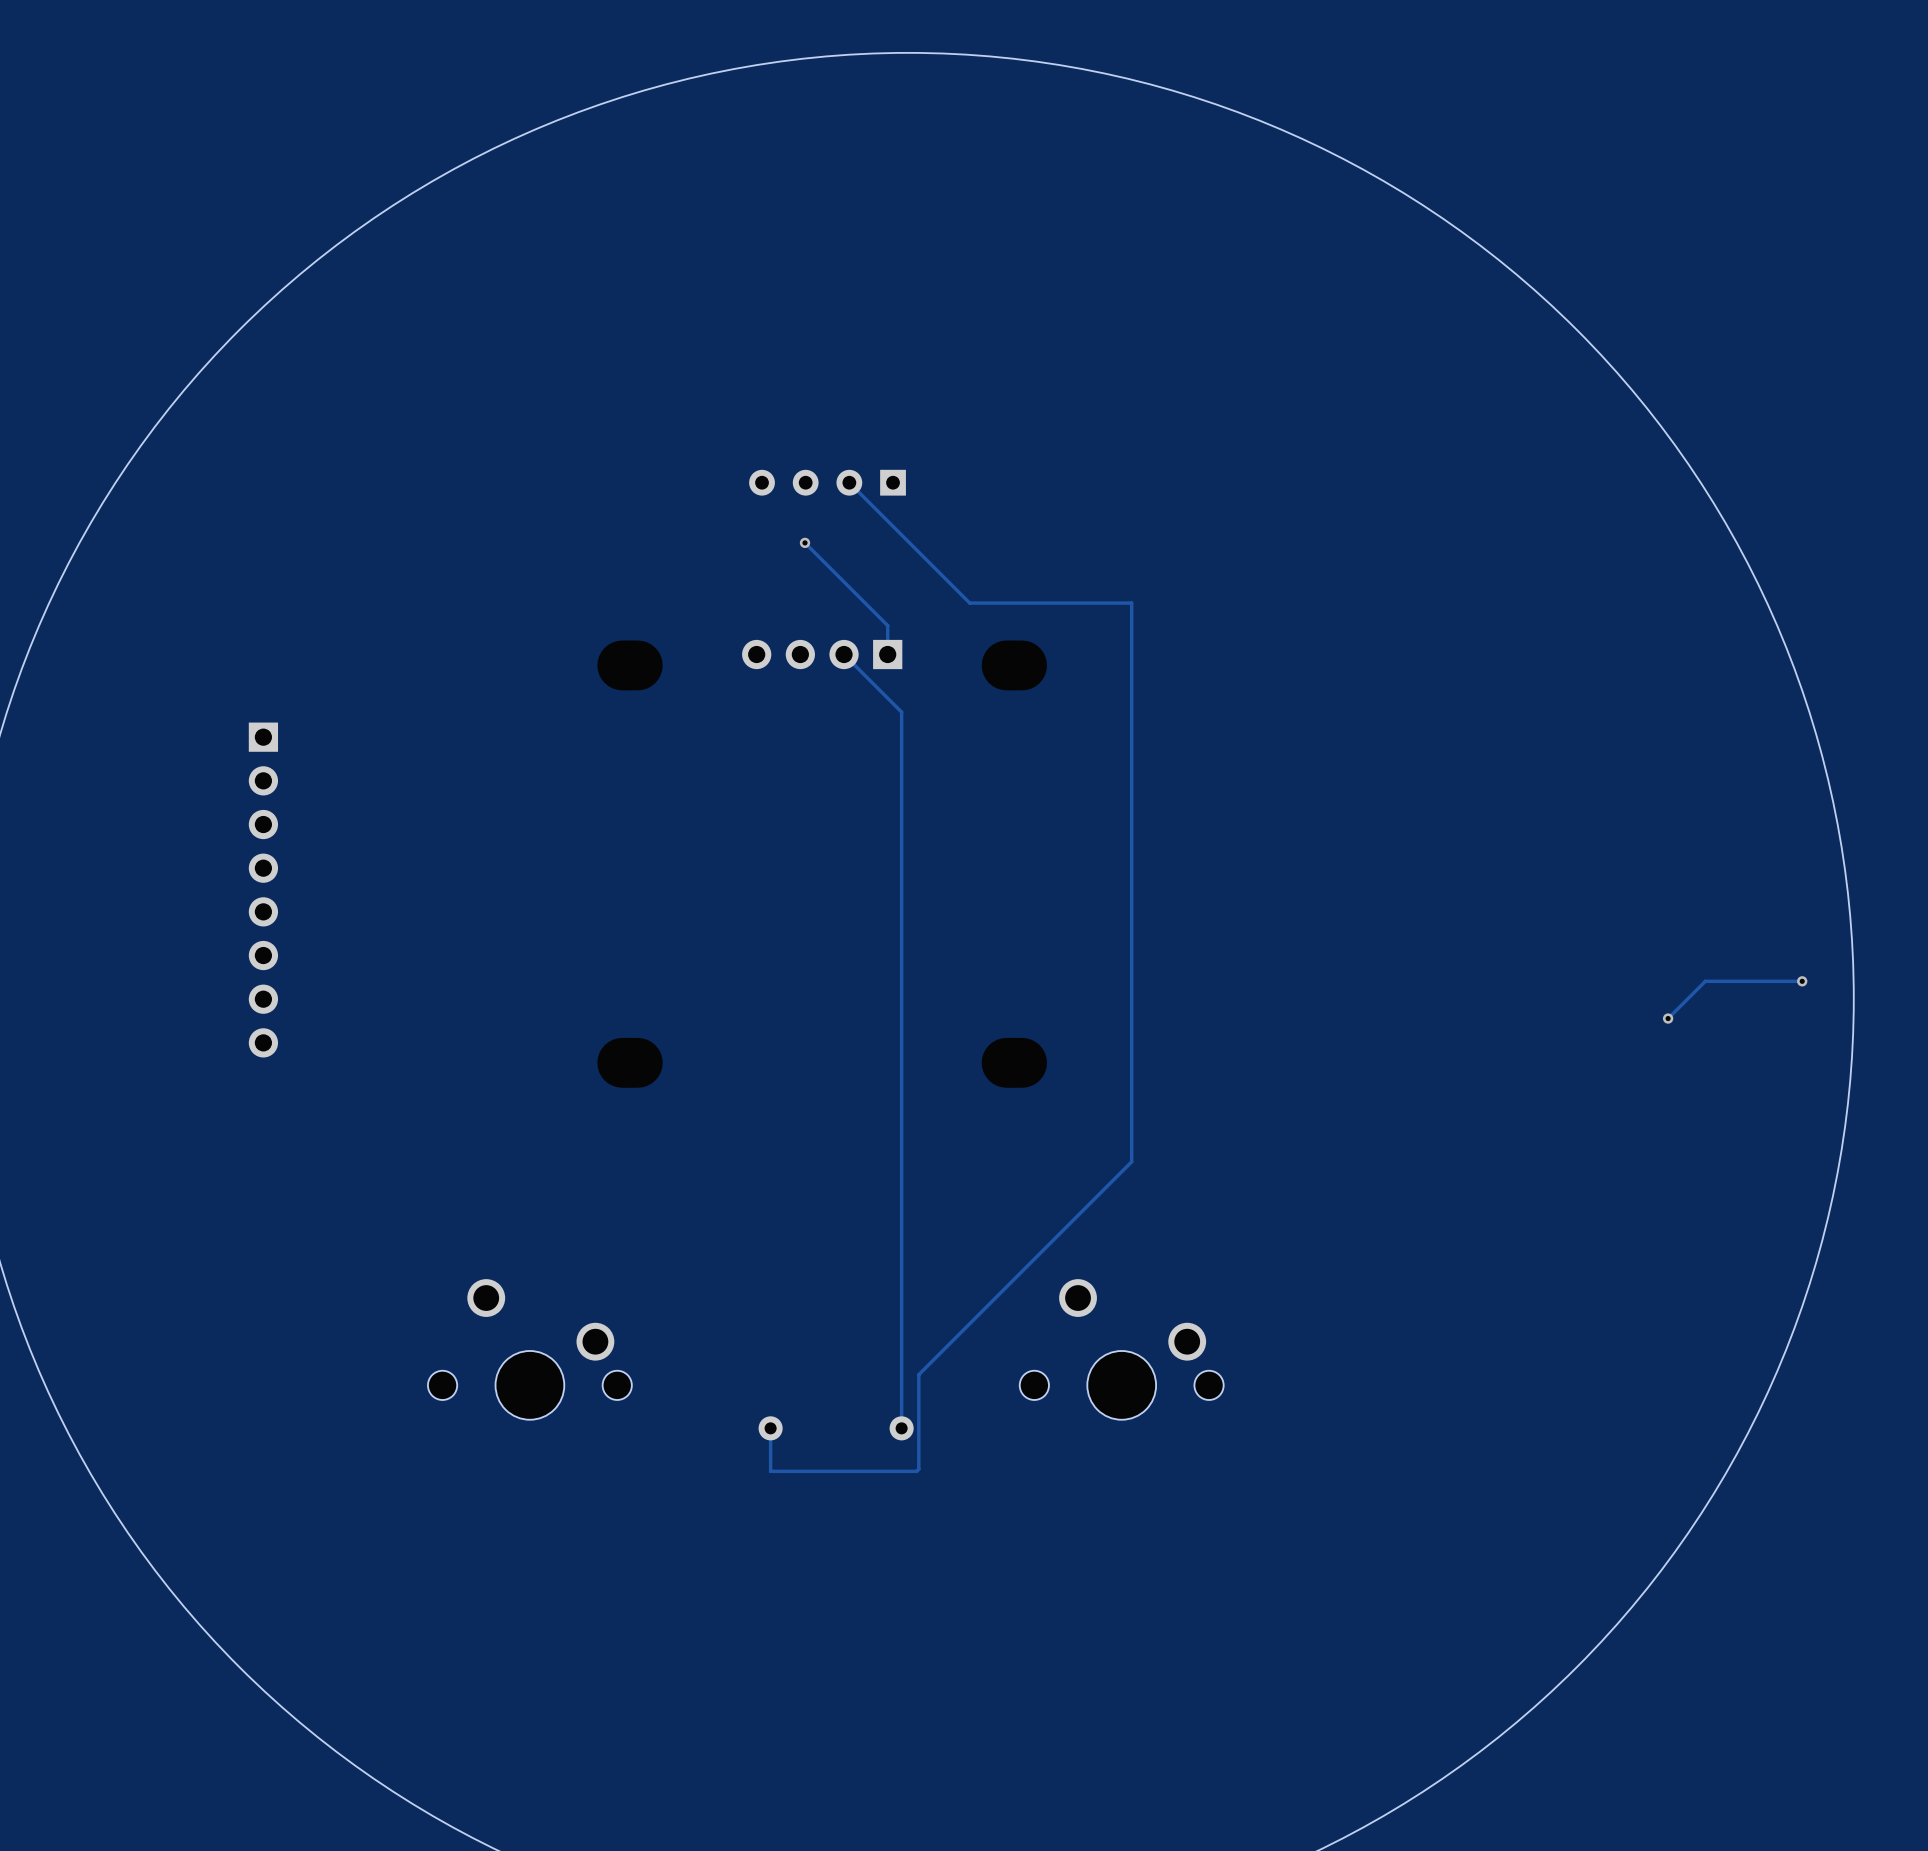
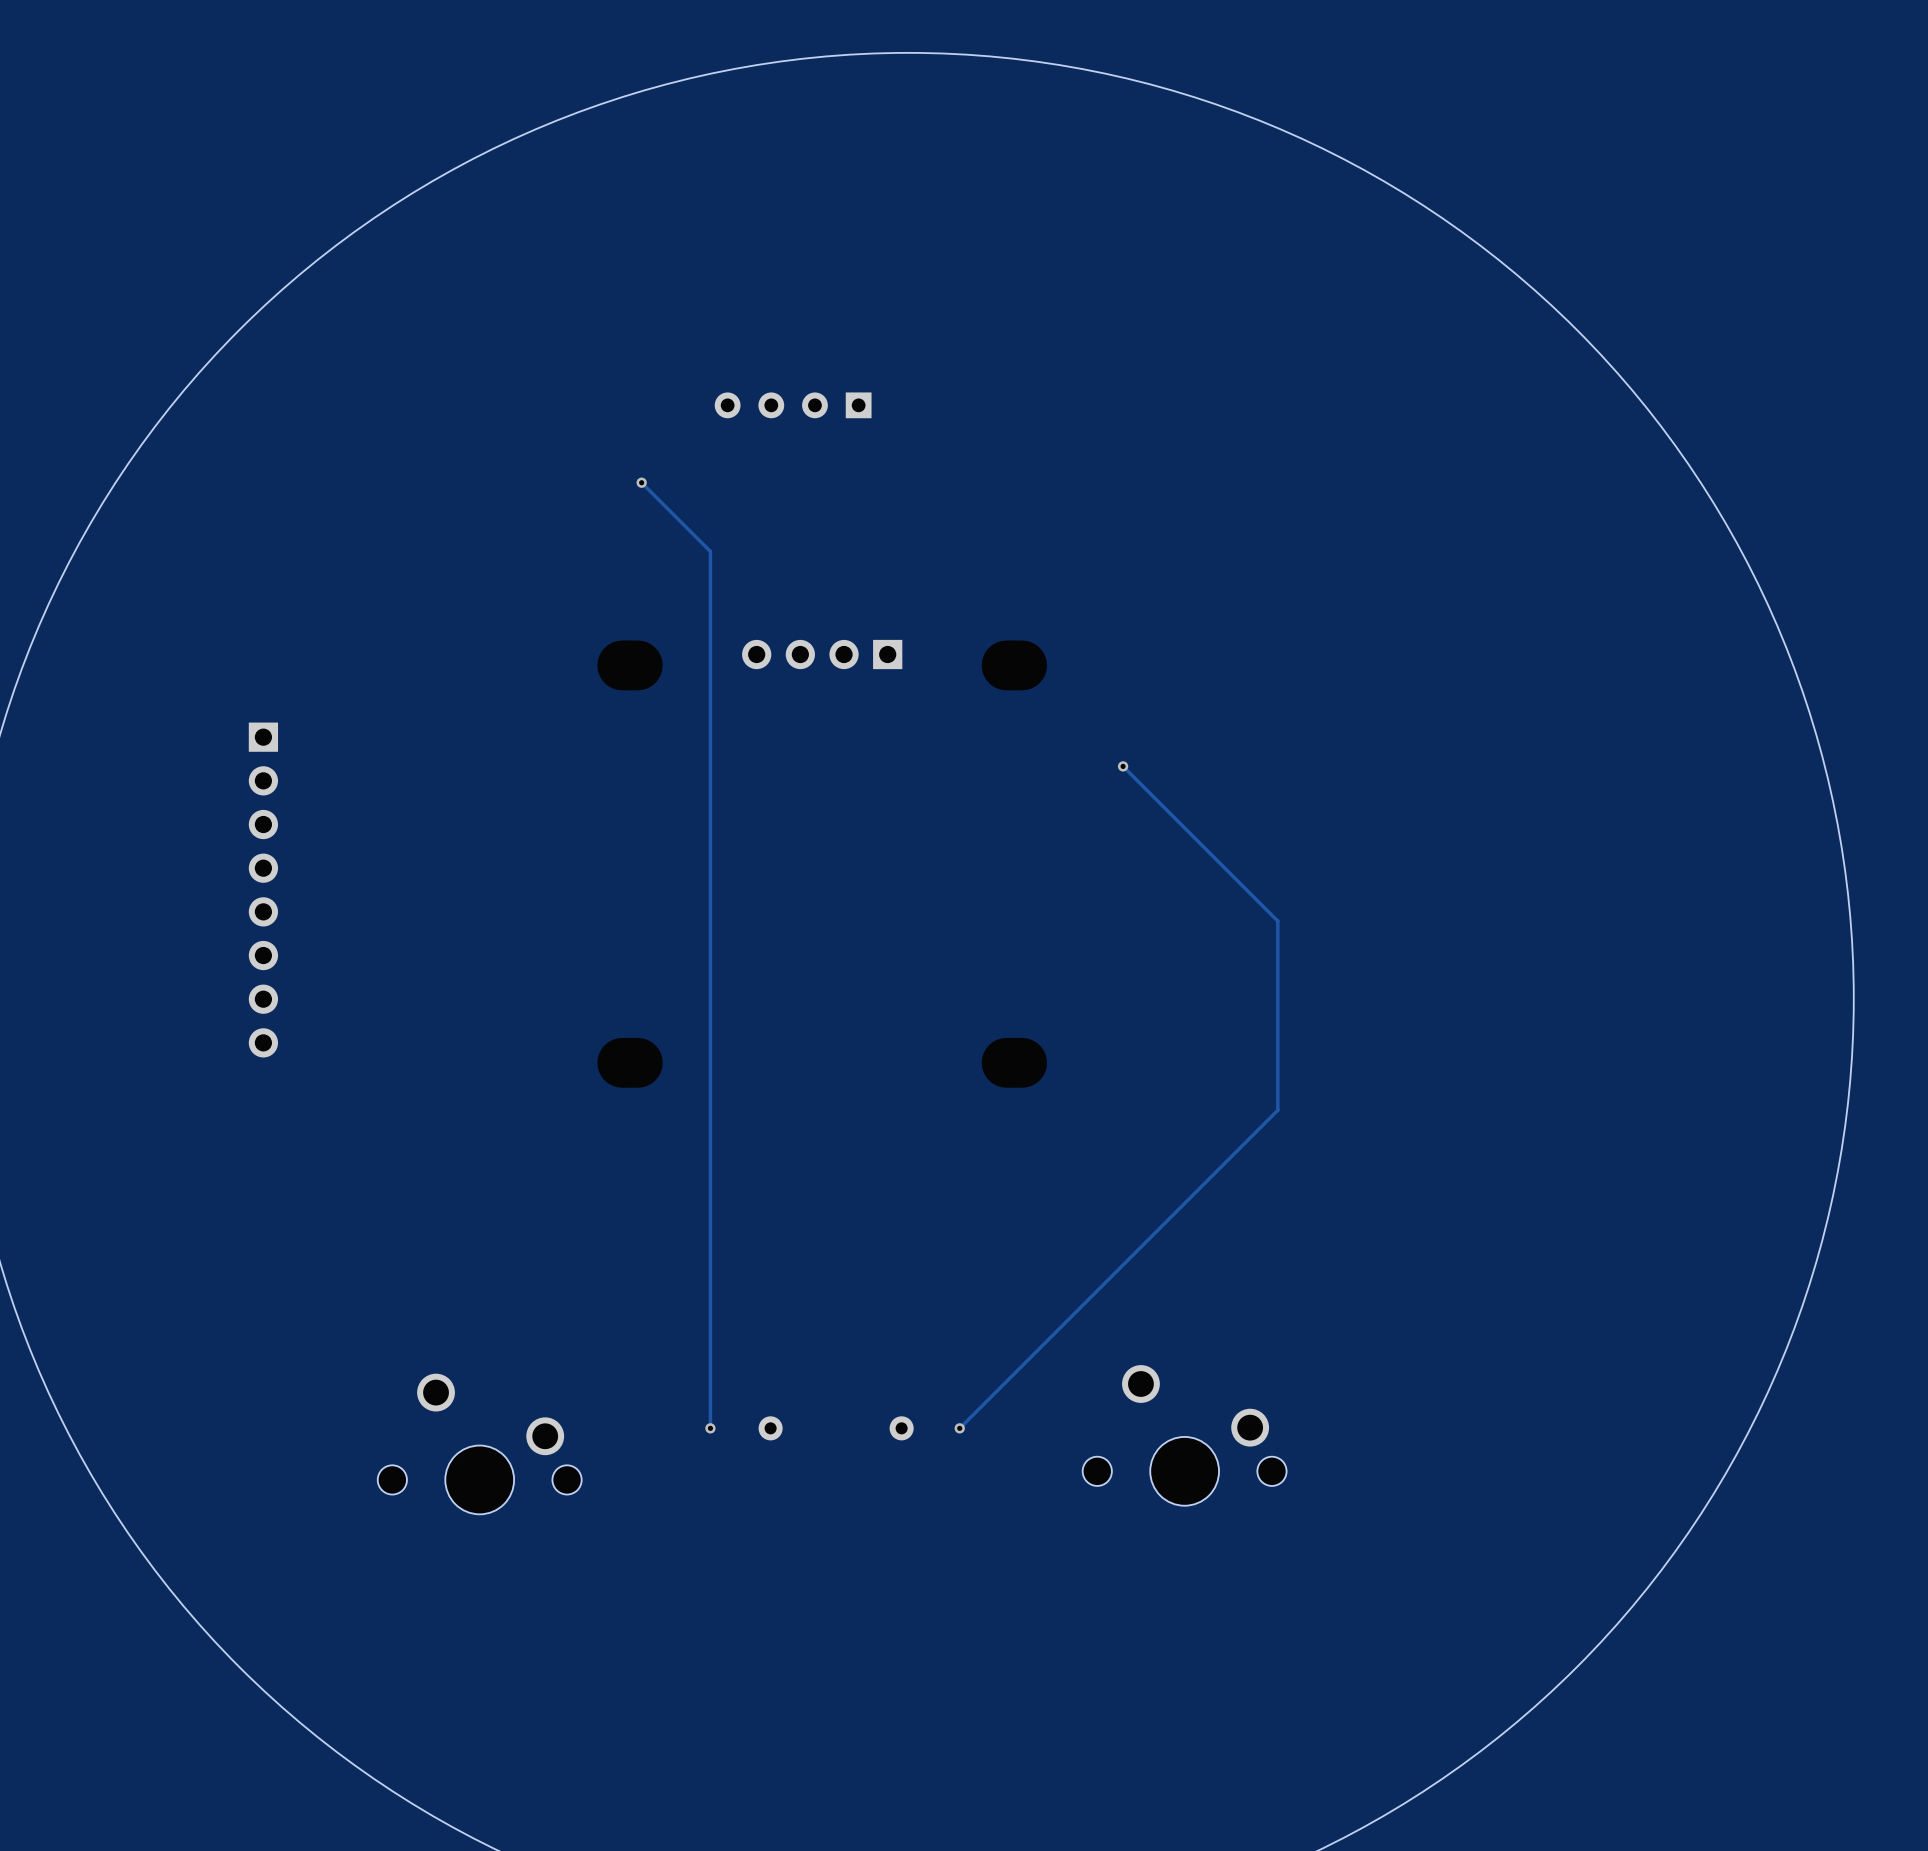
track: none -> (641, 482) (710, 551) (710, 1428)
via: none -> (641, 482)
part position: (827, 482) -> (793, 405)
track: (849, 482) (969, 603) (1131, 603) (1131, 1161) (918, 1374) (918, 1469) (916, 1471) (770, 1471) (770, 1428) -> none
track: (805, 542) (887, 625) (887, 654) -> none
via: (805, 542) -> none
track: (844, 654) (901, 712) (901, 1428) -> none
track: none -> (1123, 766) (1277, 921) (1277, 1110) (959, 1428)
via: none -> (1123, 766)
track: (1802, 981) (1705, 981) (1668, 1018) -> none
via: (1802, 981) -> none
via: (1668, 1018) -> none
part position: (529, 1349) -> (479, 1444)
part position: (1121, 1349) -> (1184, 1435)
via: none -> (710, 1428)
via: none -> (959, 1428)

